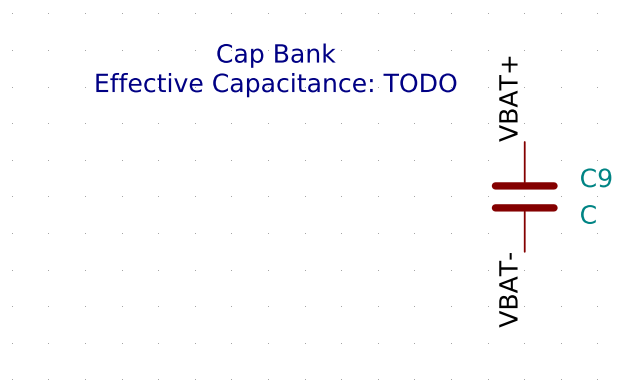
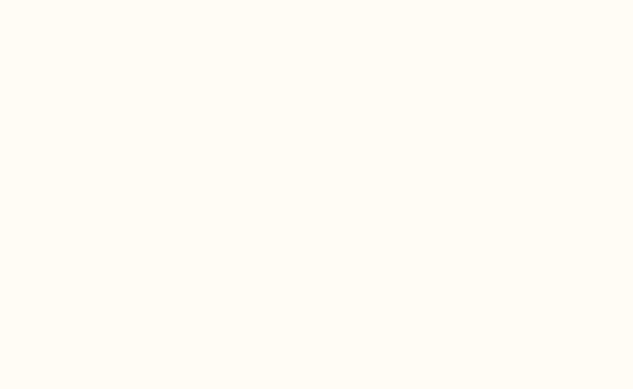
text: Cap Bank (276, 55) -> none
text: Effective Capacitance: TODO (276, 85) -> none
label: VBAT+ (508, 99) -> none
C9: C (524, 196) -> none
label: VBAT- (508, 290) -> none

